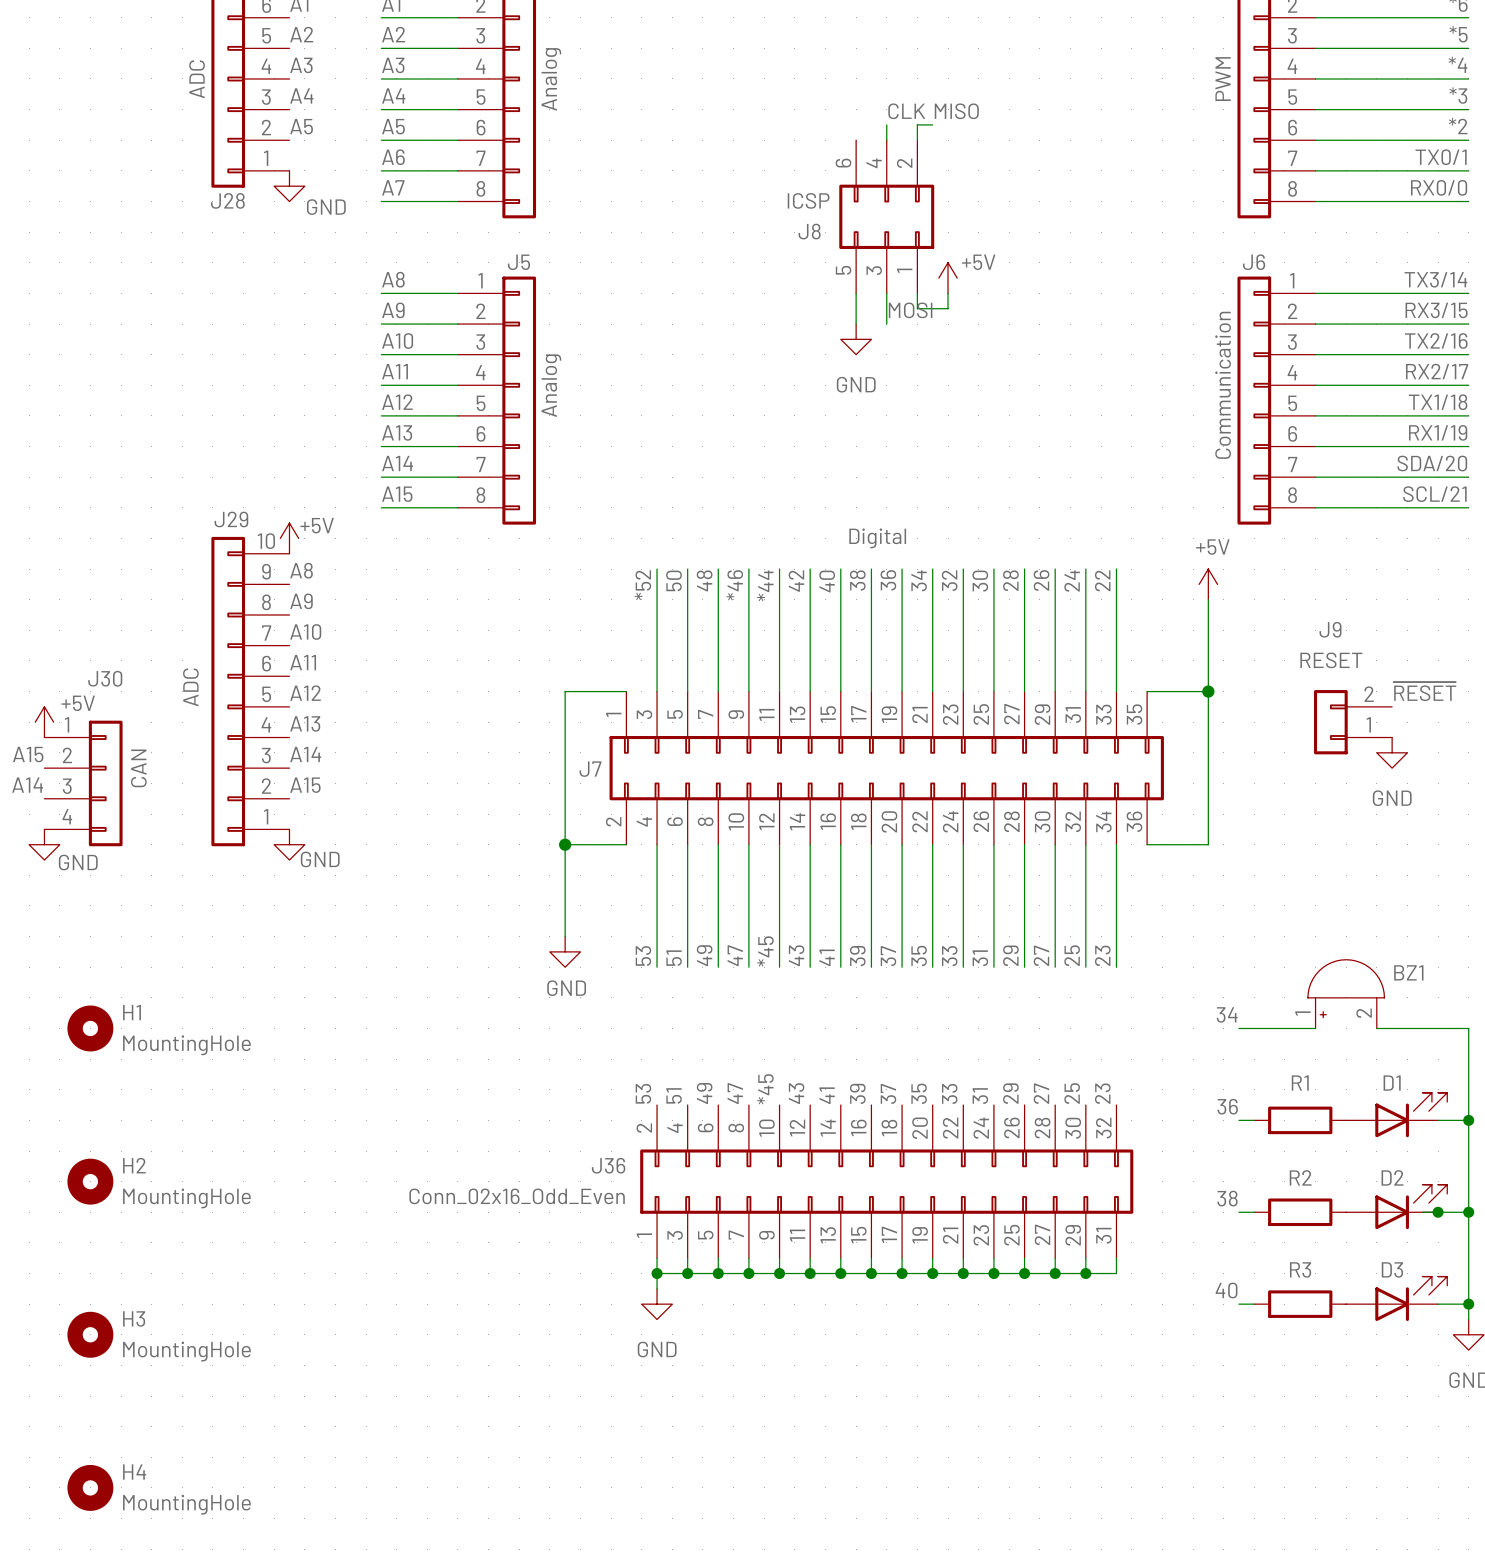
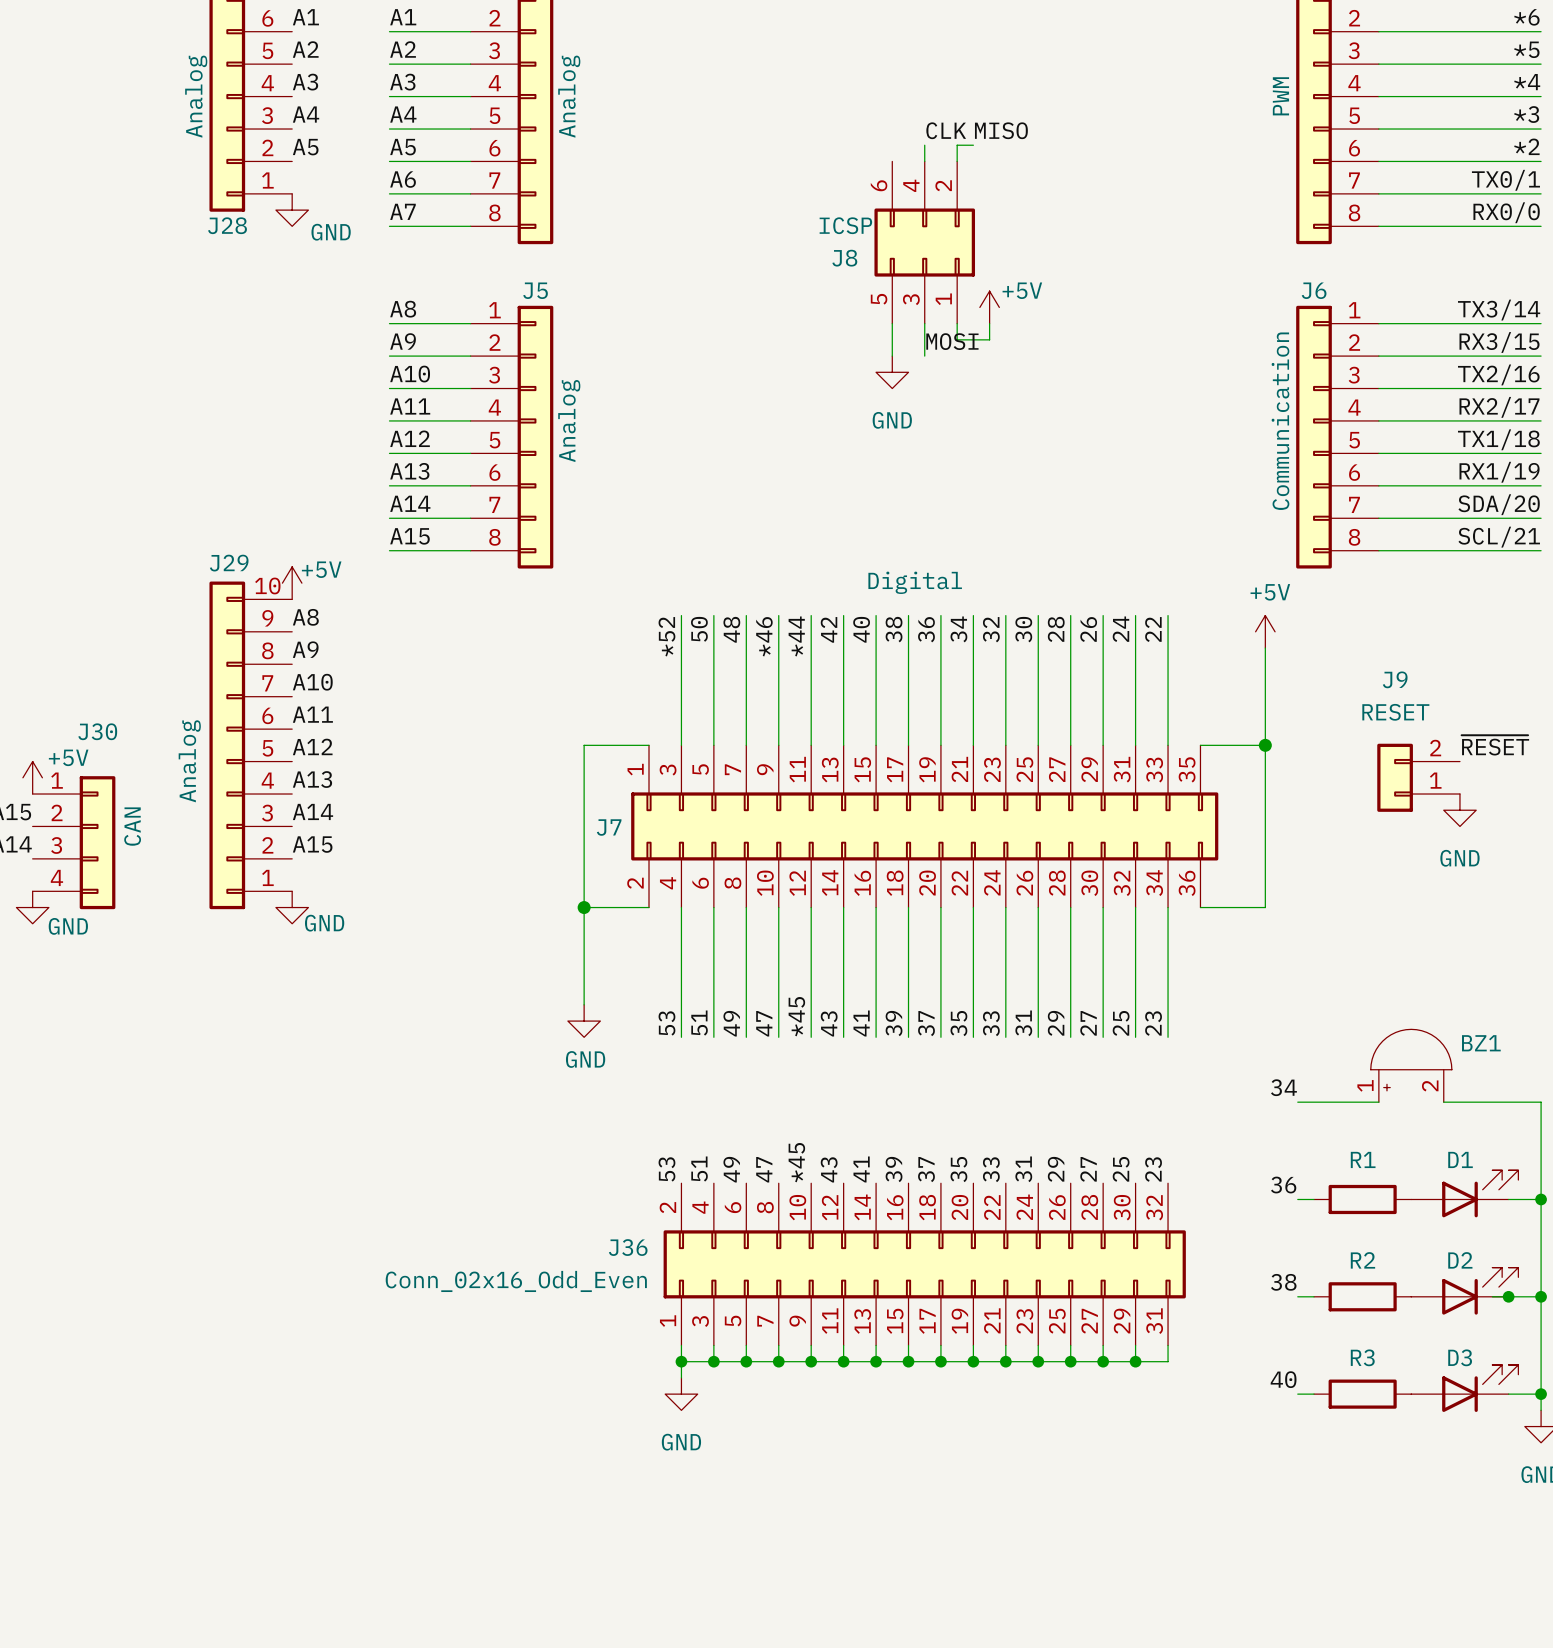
J28 value: ADC (197, 79) -> Analog (196, 96)
J29 value: ADC (190, 687) -> Analog (189, 761)
H1: MountingHole (90, 1028) -> none
H2: MountingHole (90, 1181) -> none
H3: MountingHole (90, 1334) -> none
H4: MountingHole (90, 1487) -> none

